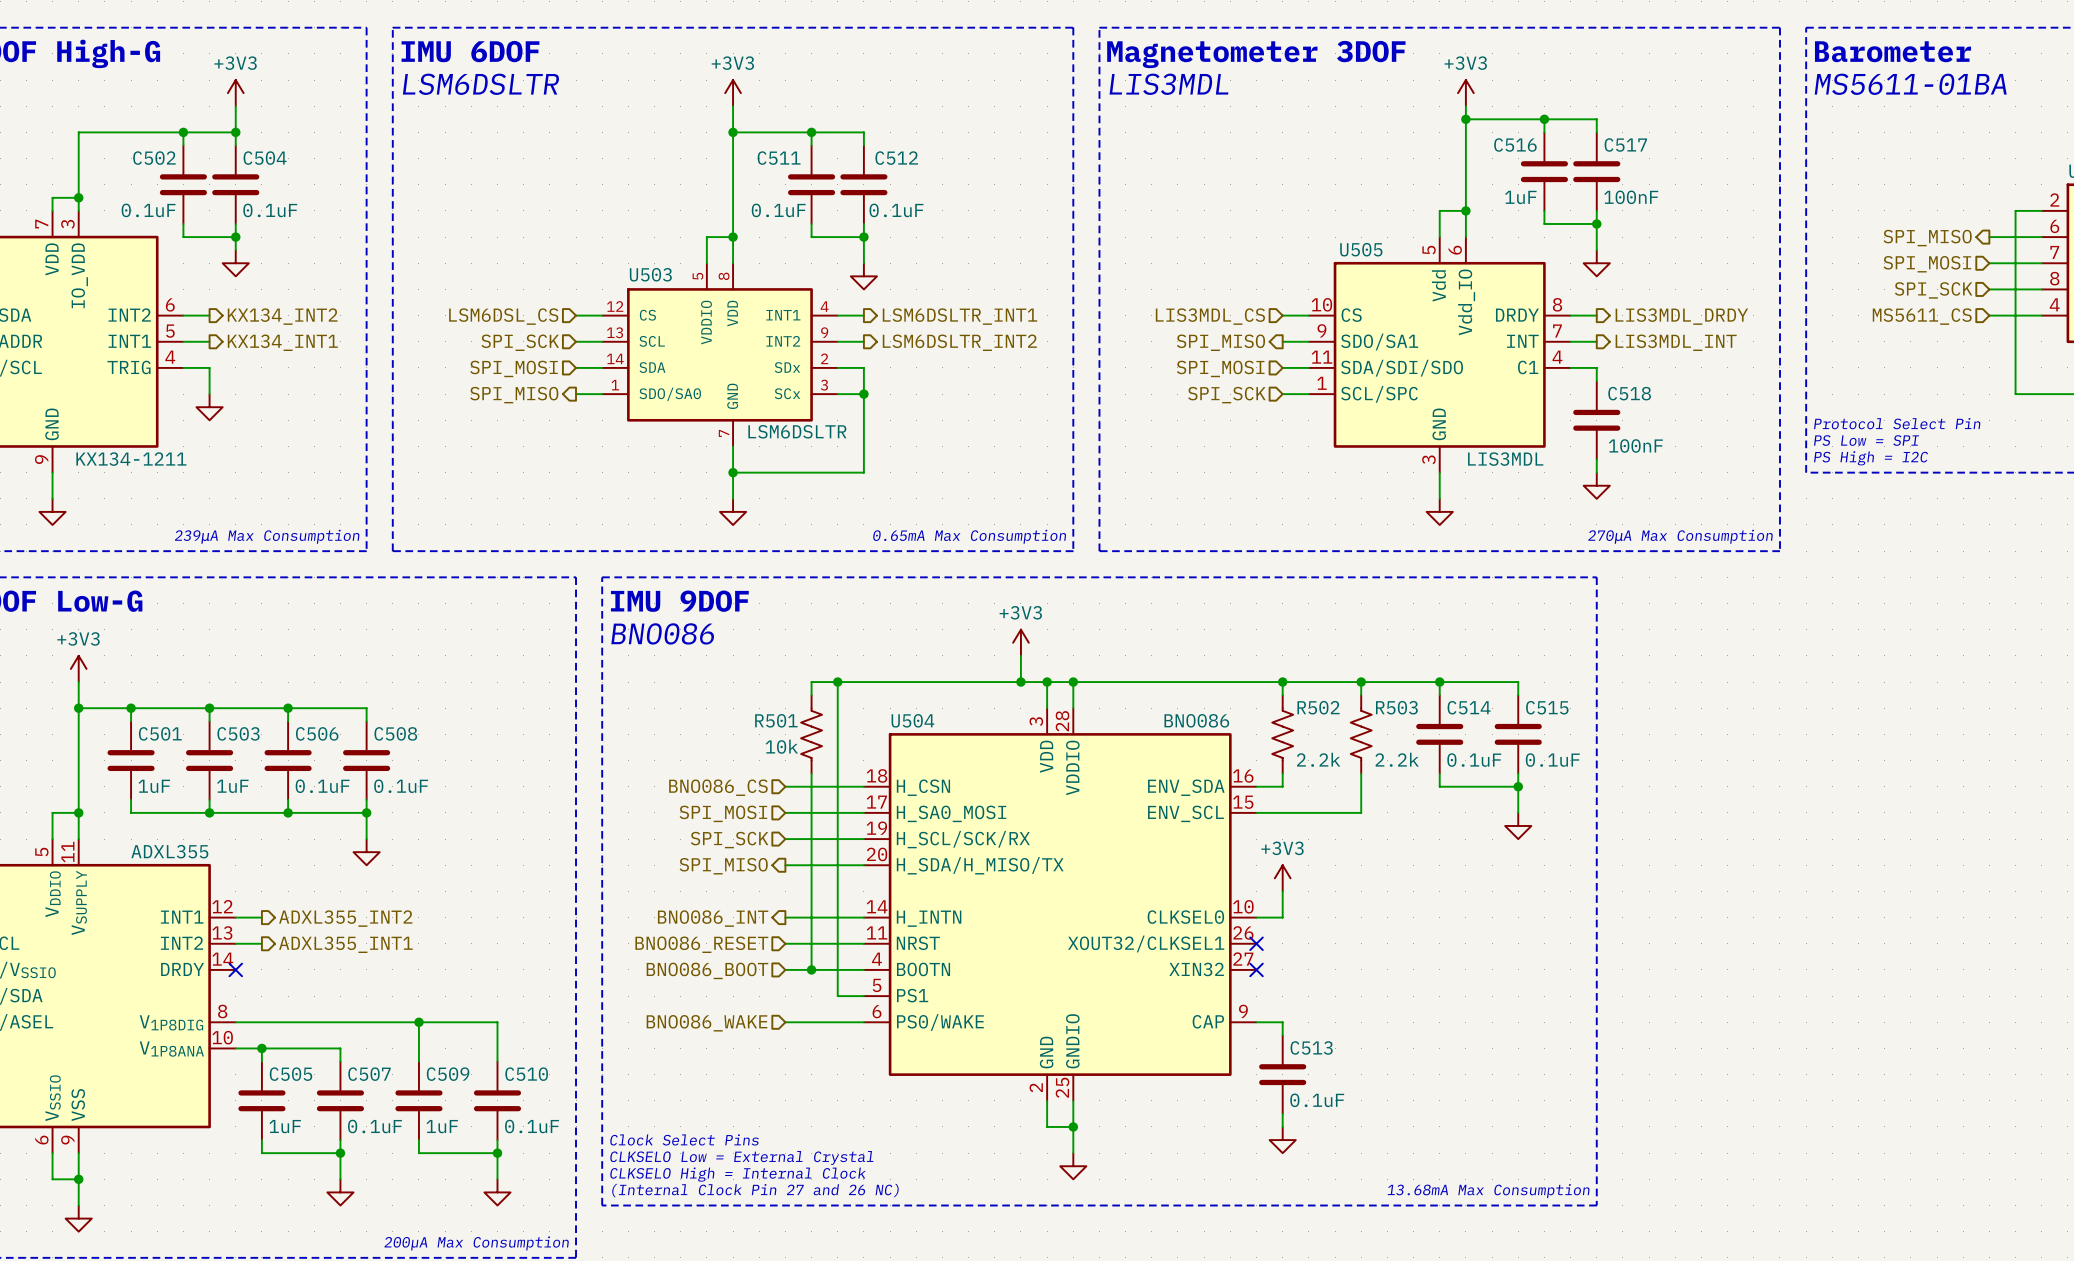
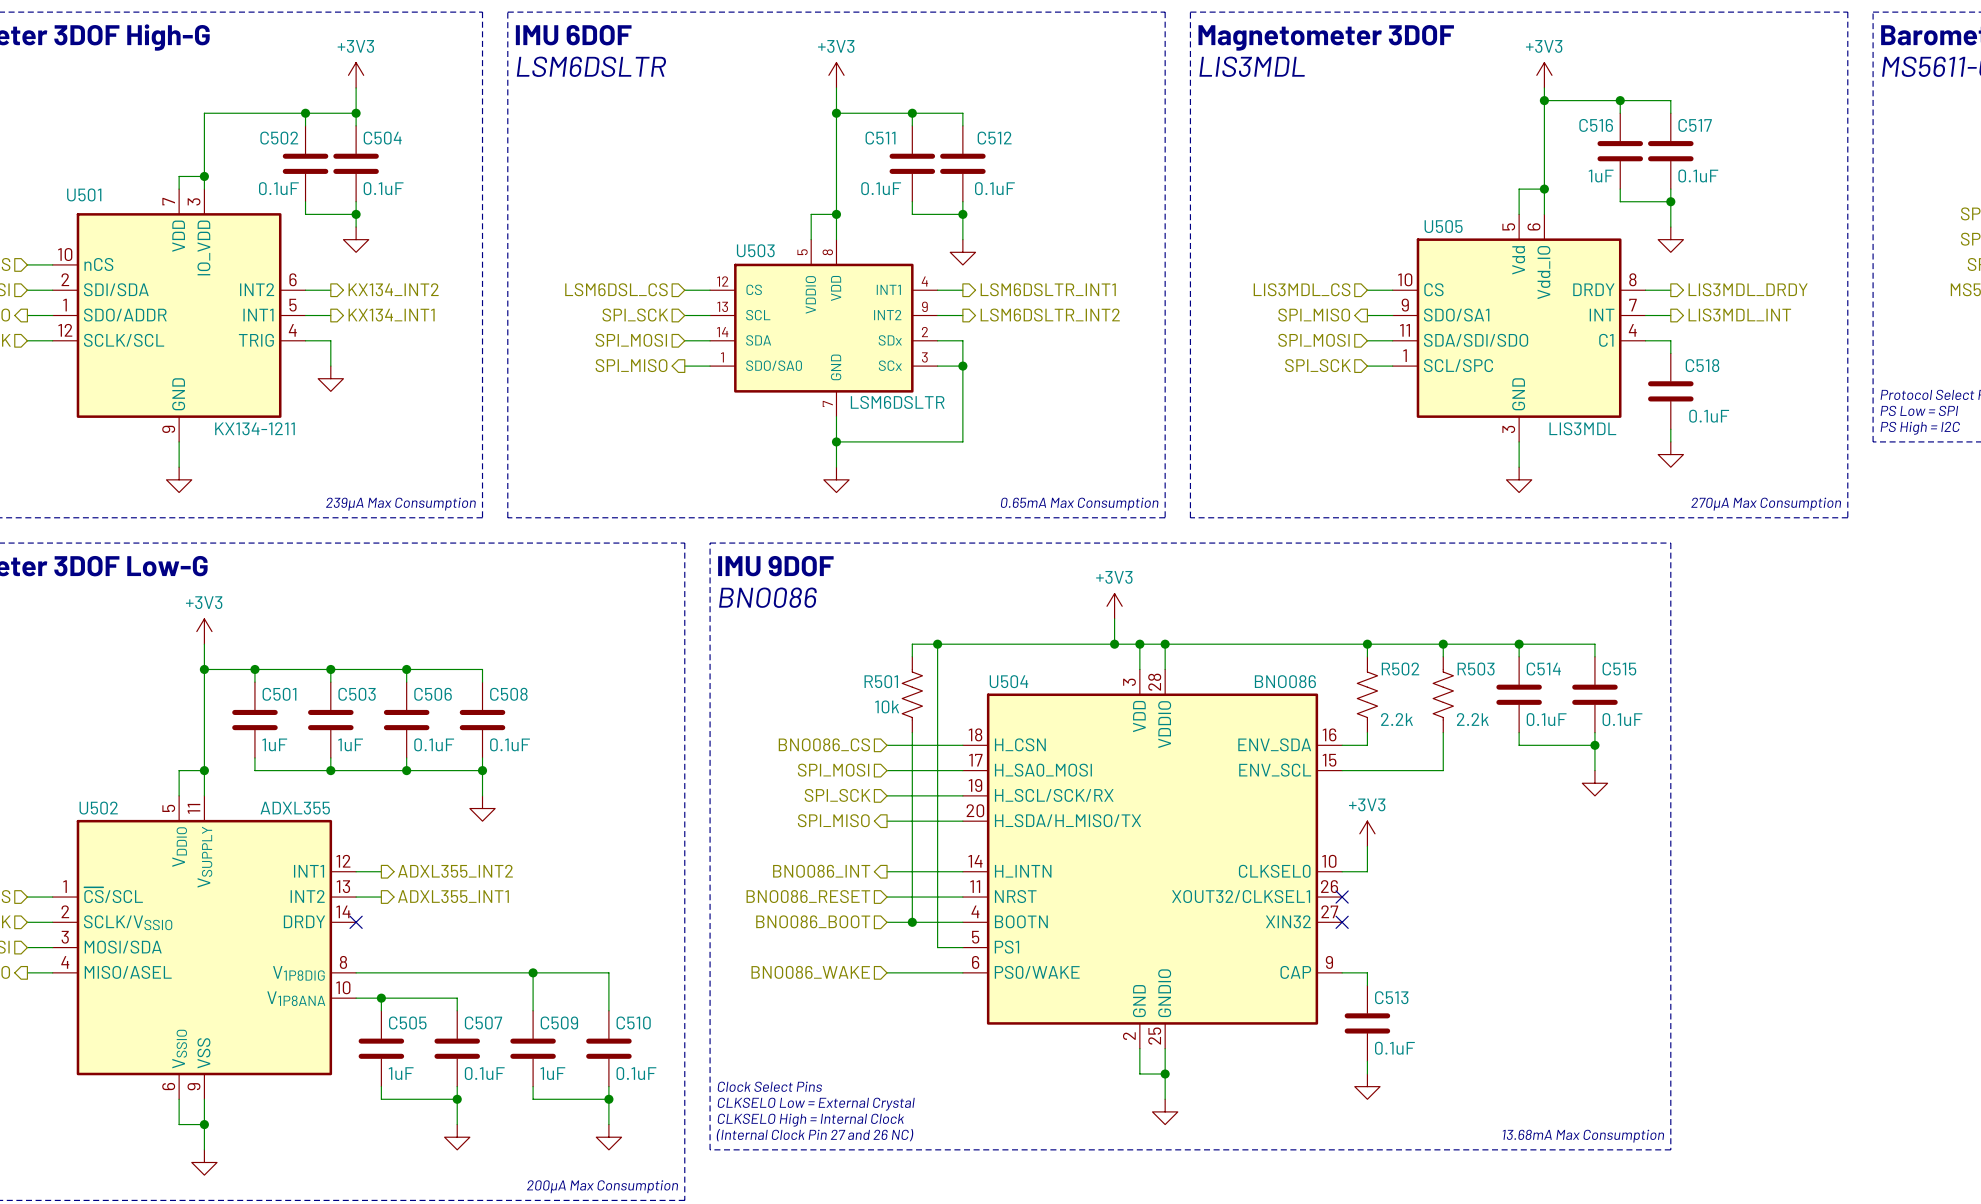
C517 value: 100nF (1631, 197) -> 0.1uF (1698, 175)
C518 value: 100nF (1635, 445) -> 0.1uF (1709, 416)

